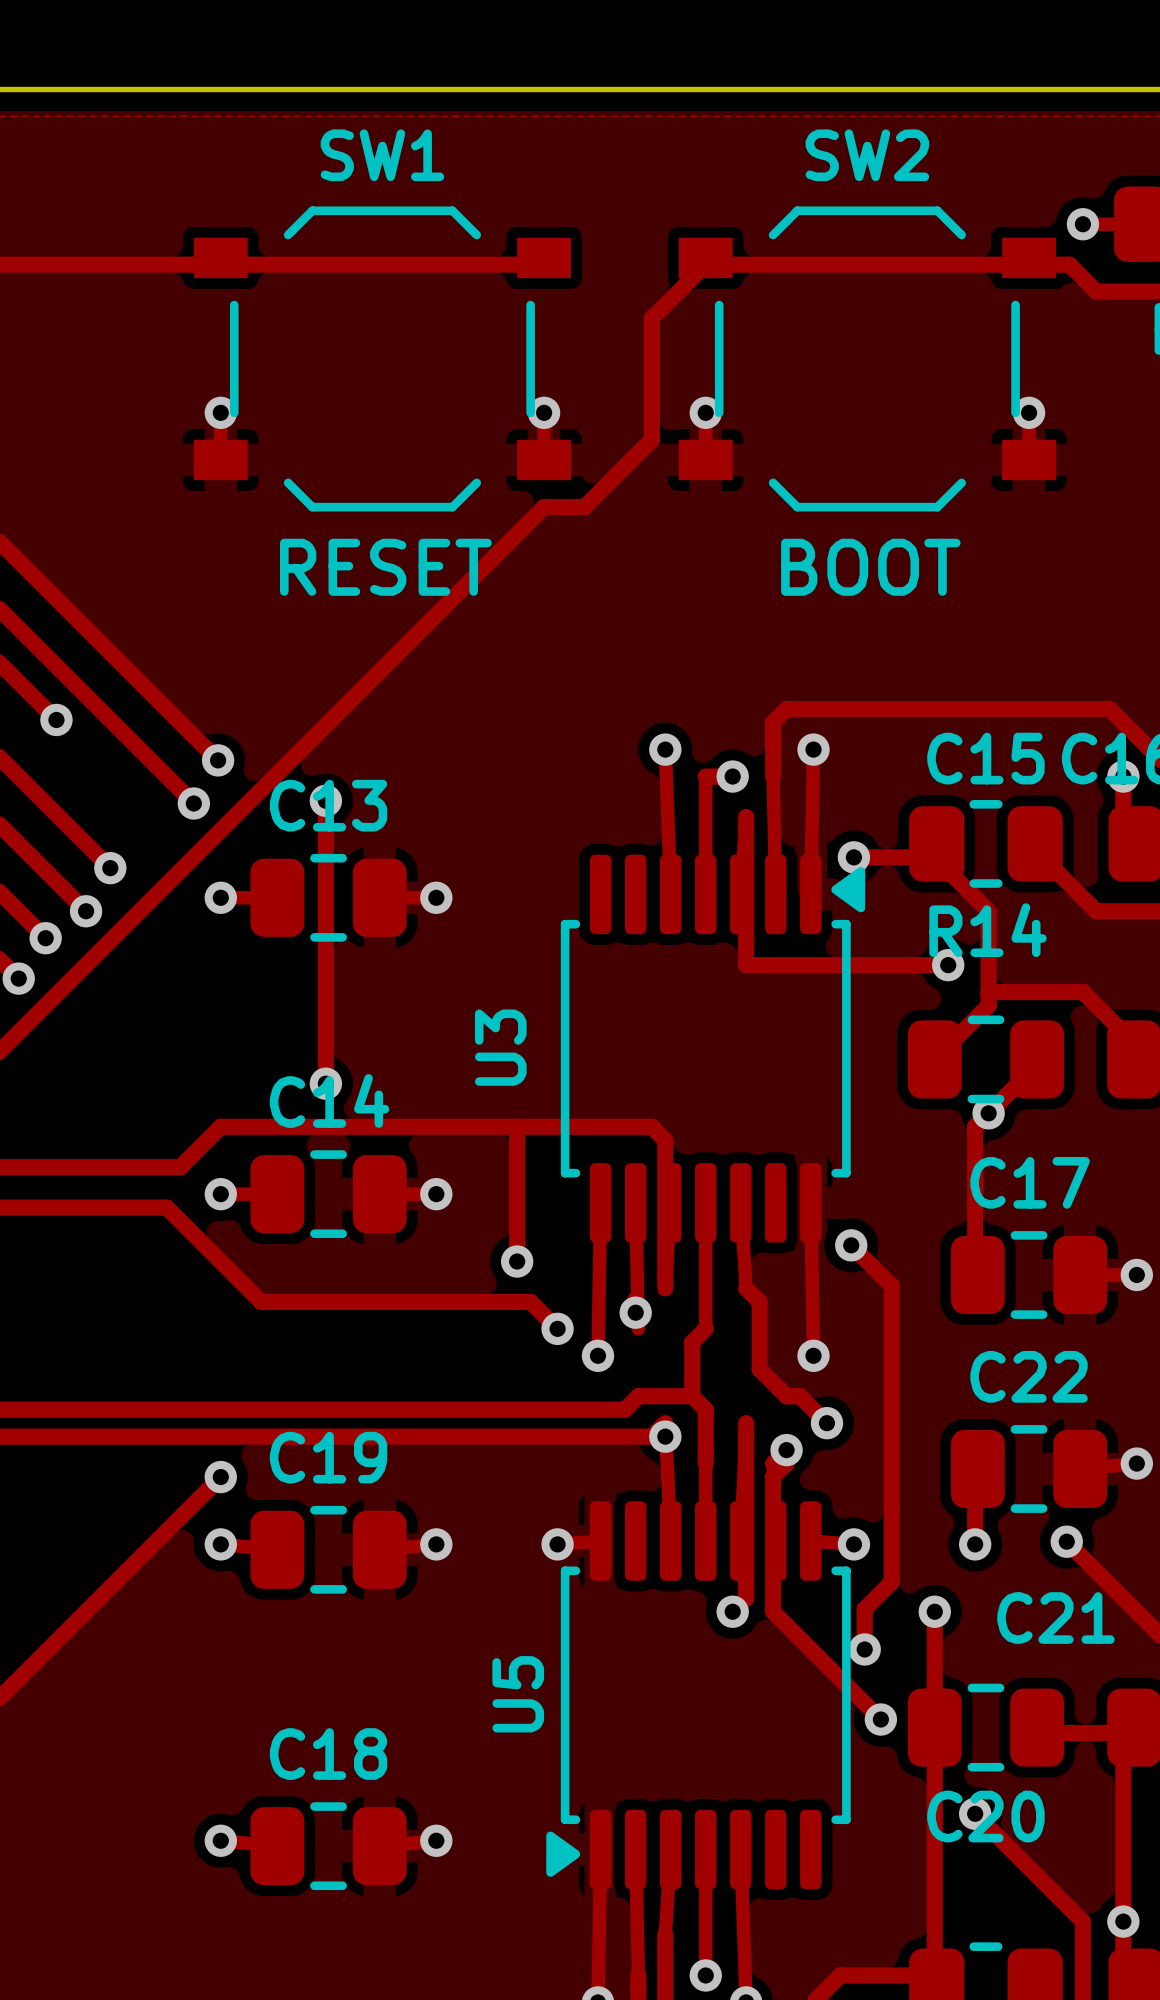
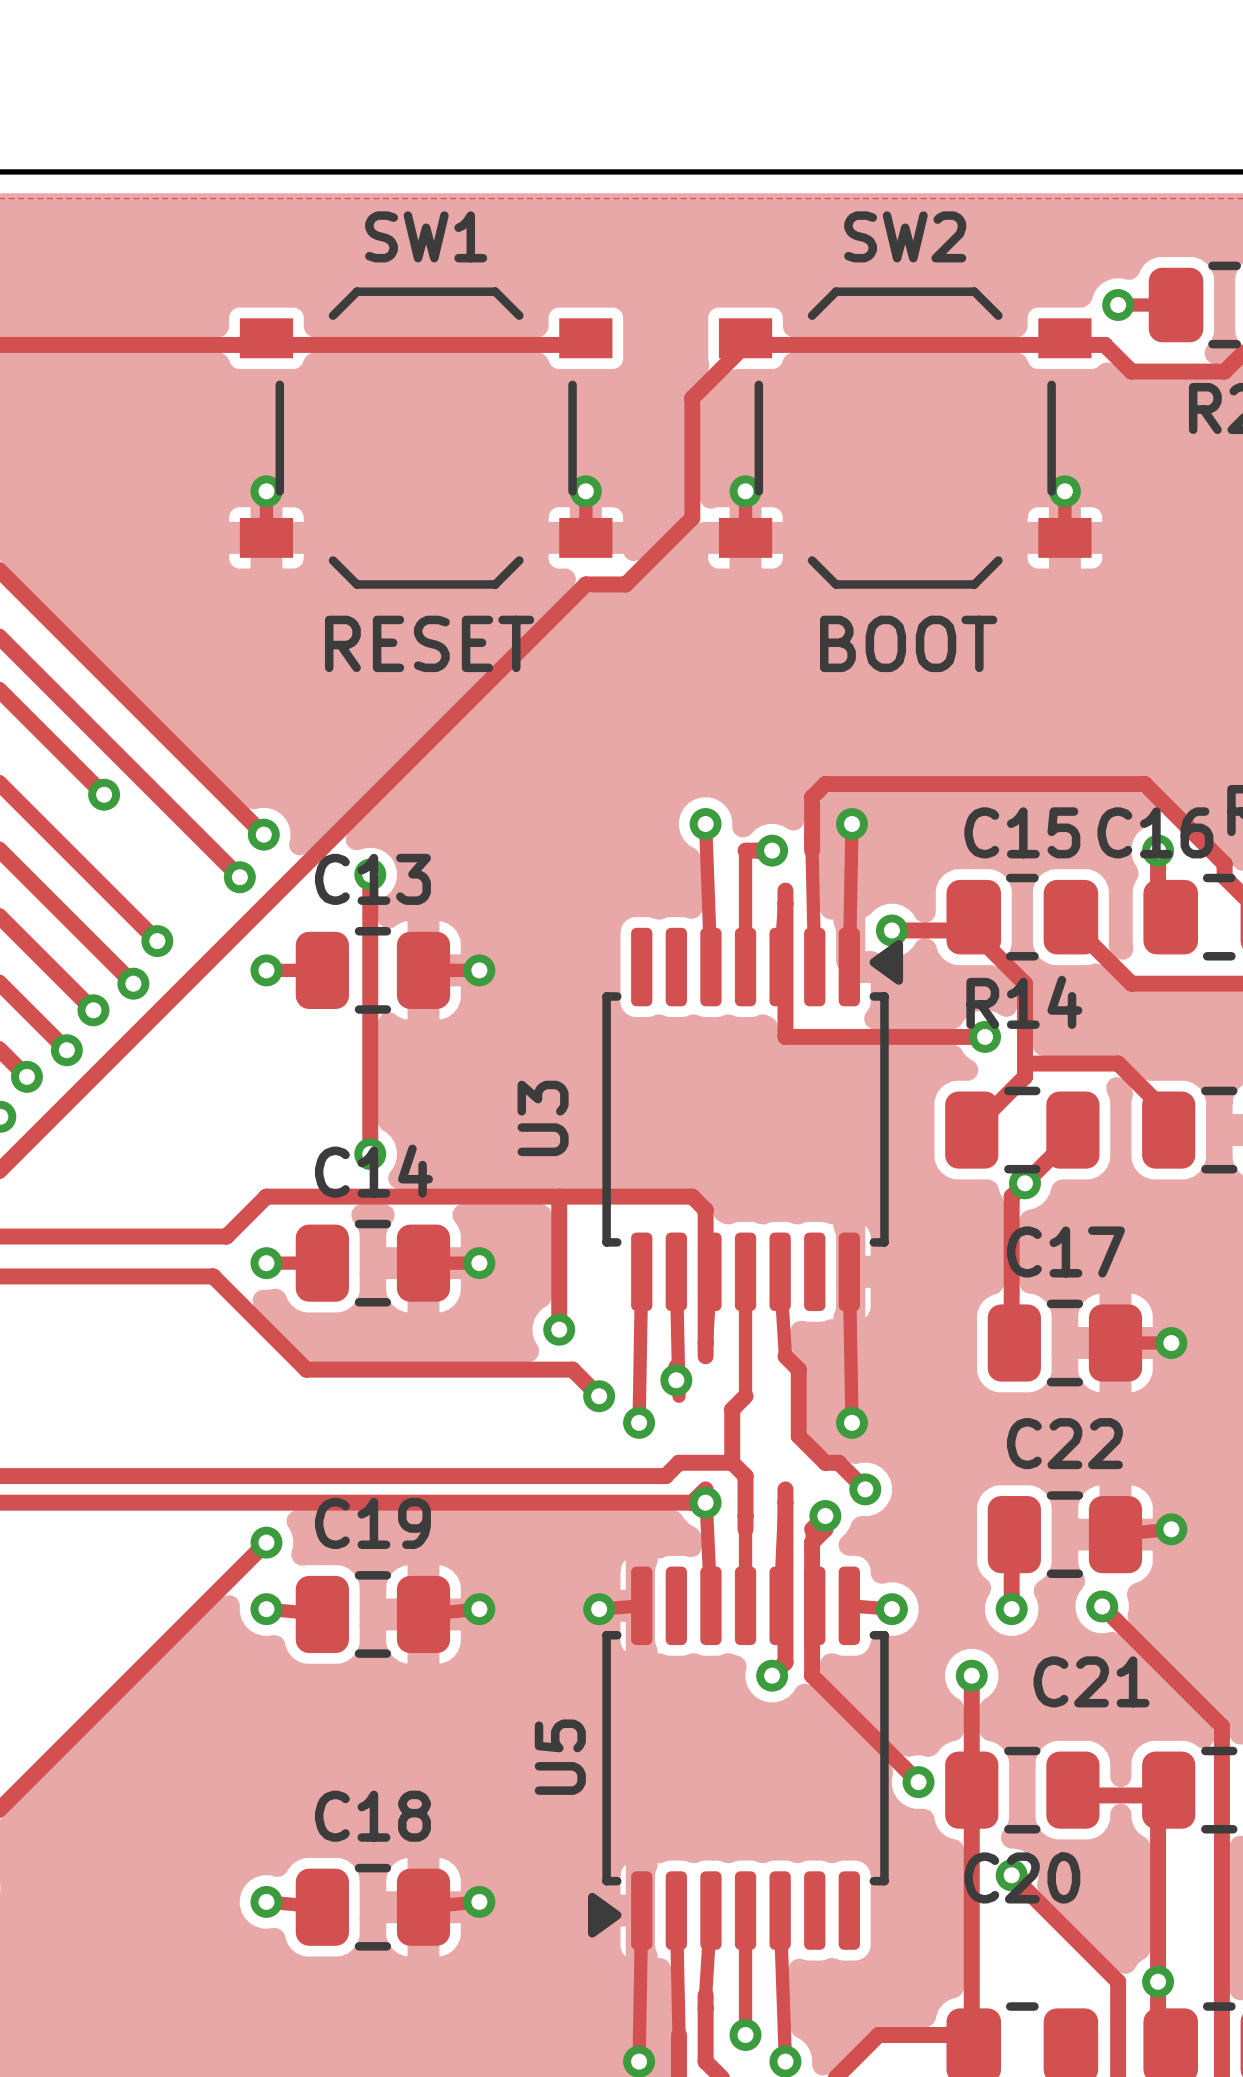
track: (851, 1245) (891, 1285) (891, 1582) (864, 1609) (864, 1649) -> none
via: (851, 1245) -> none
via: (864, 1649) -> none

